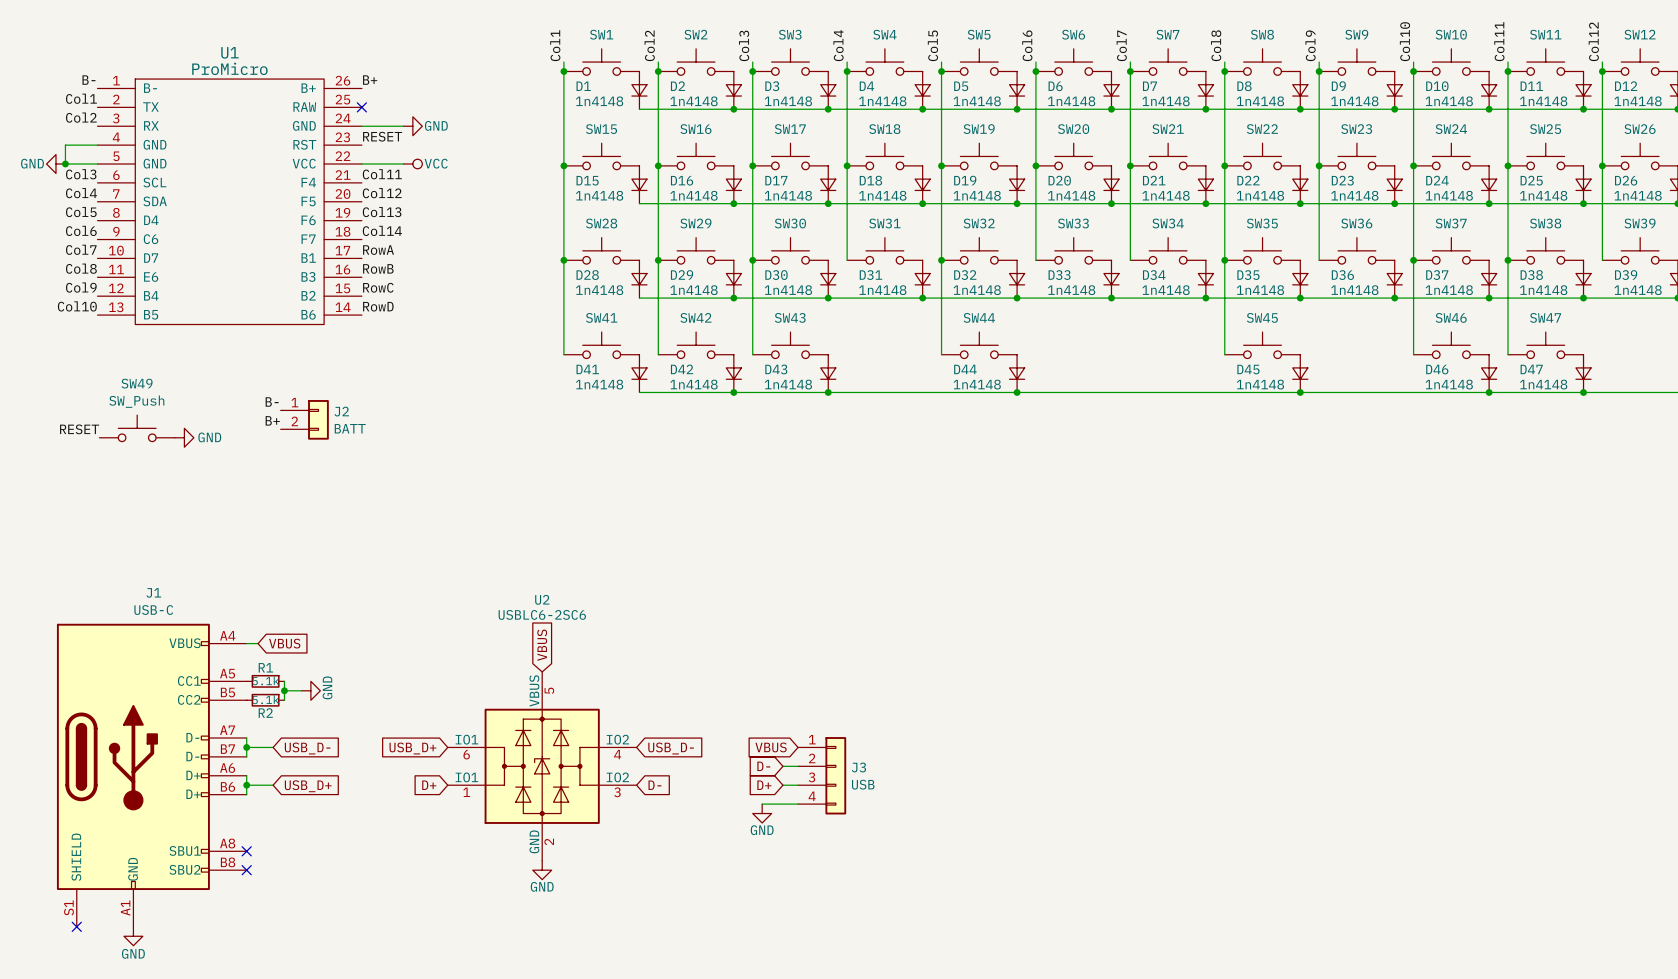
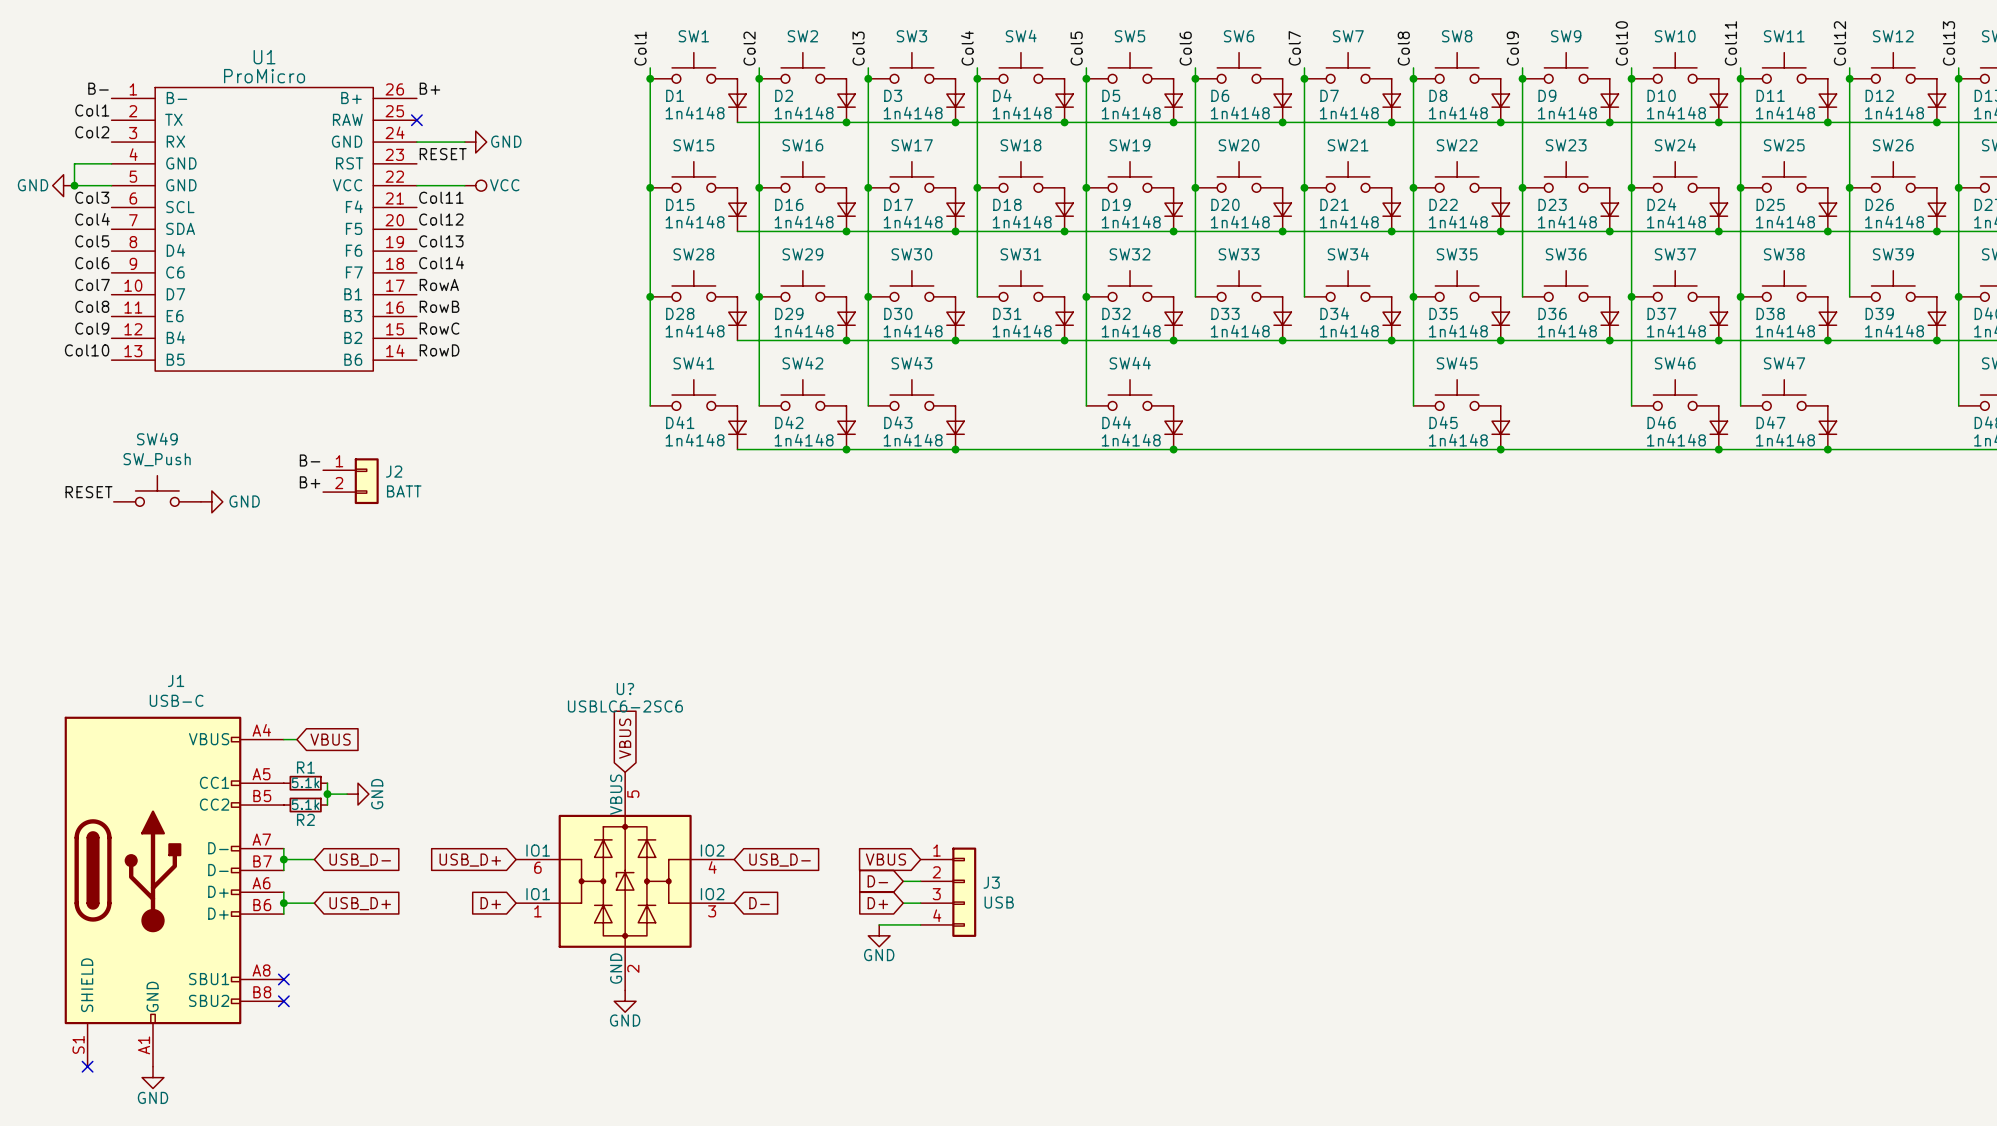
U2 name: U2 (542, 599) -> U? (625, 689)

